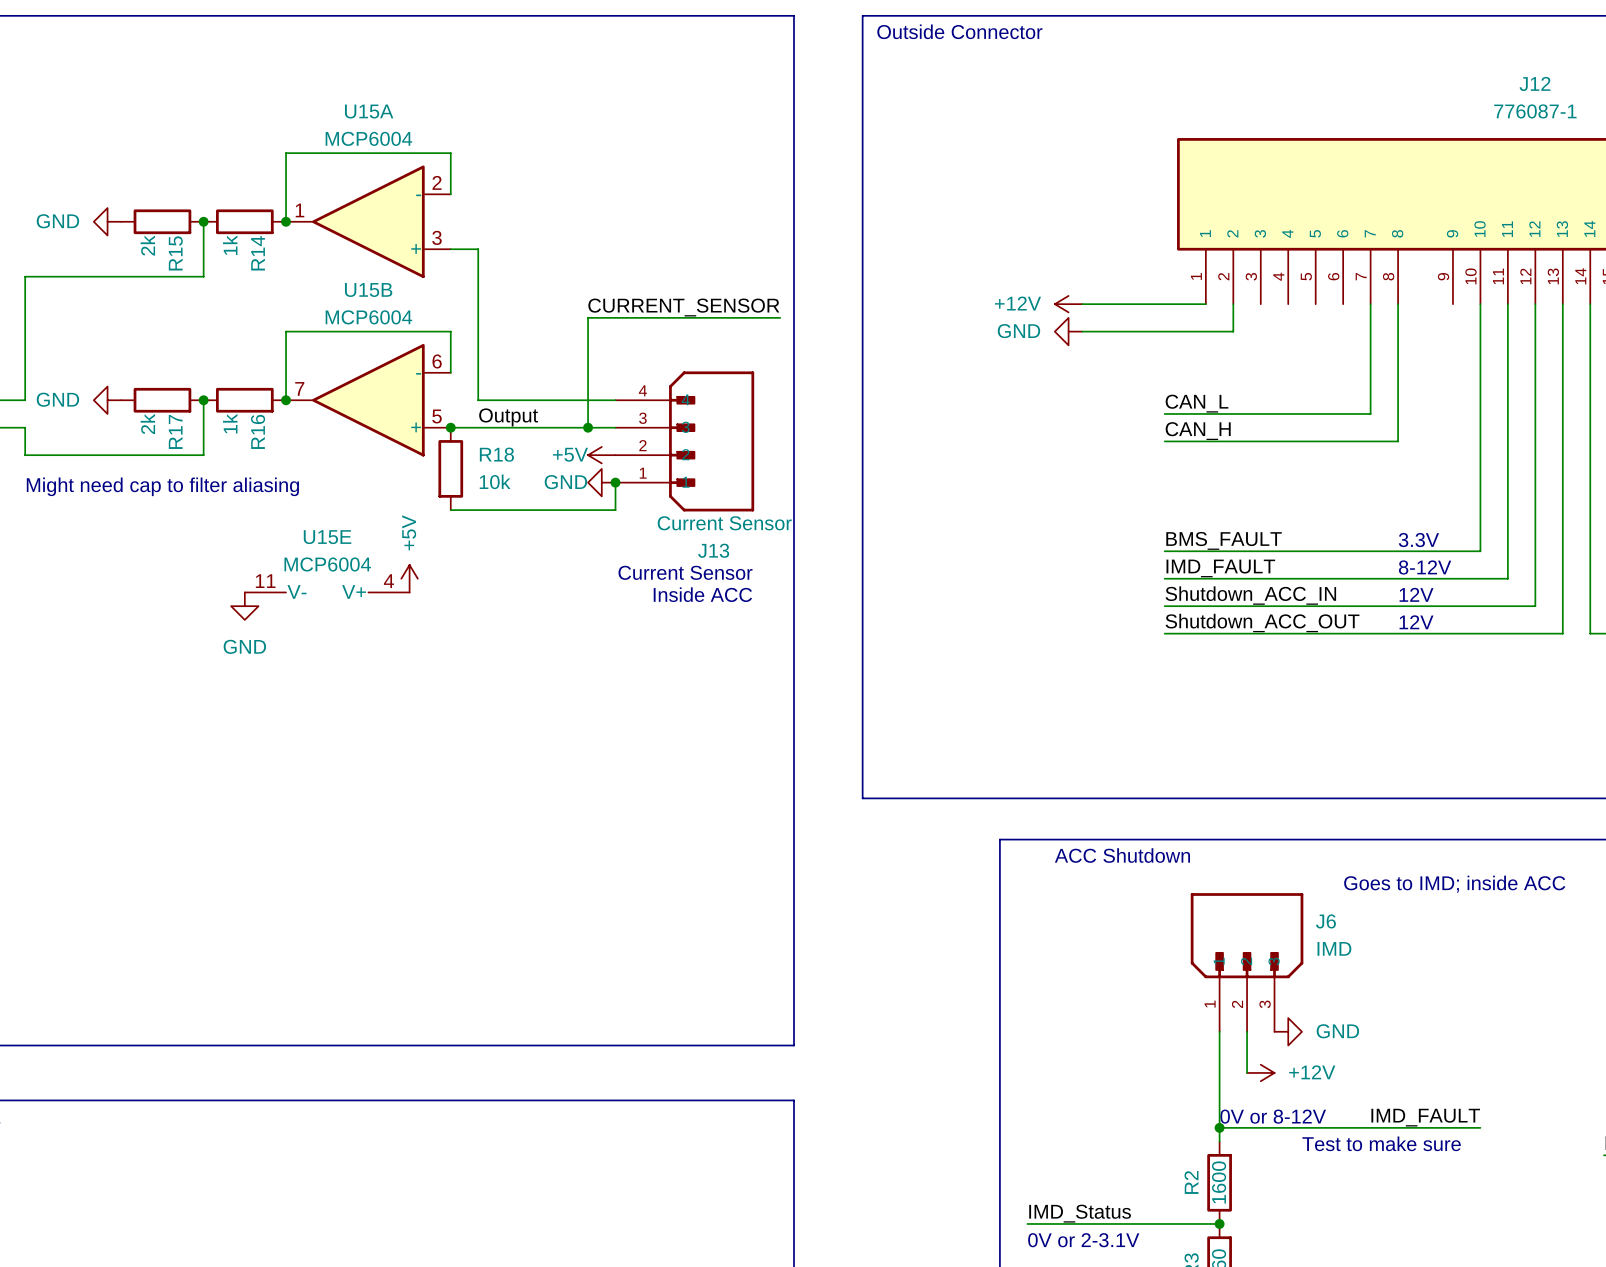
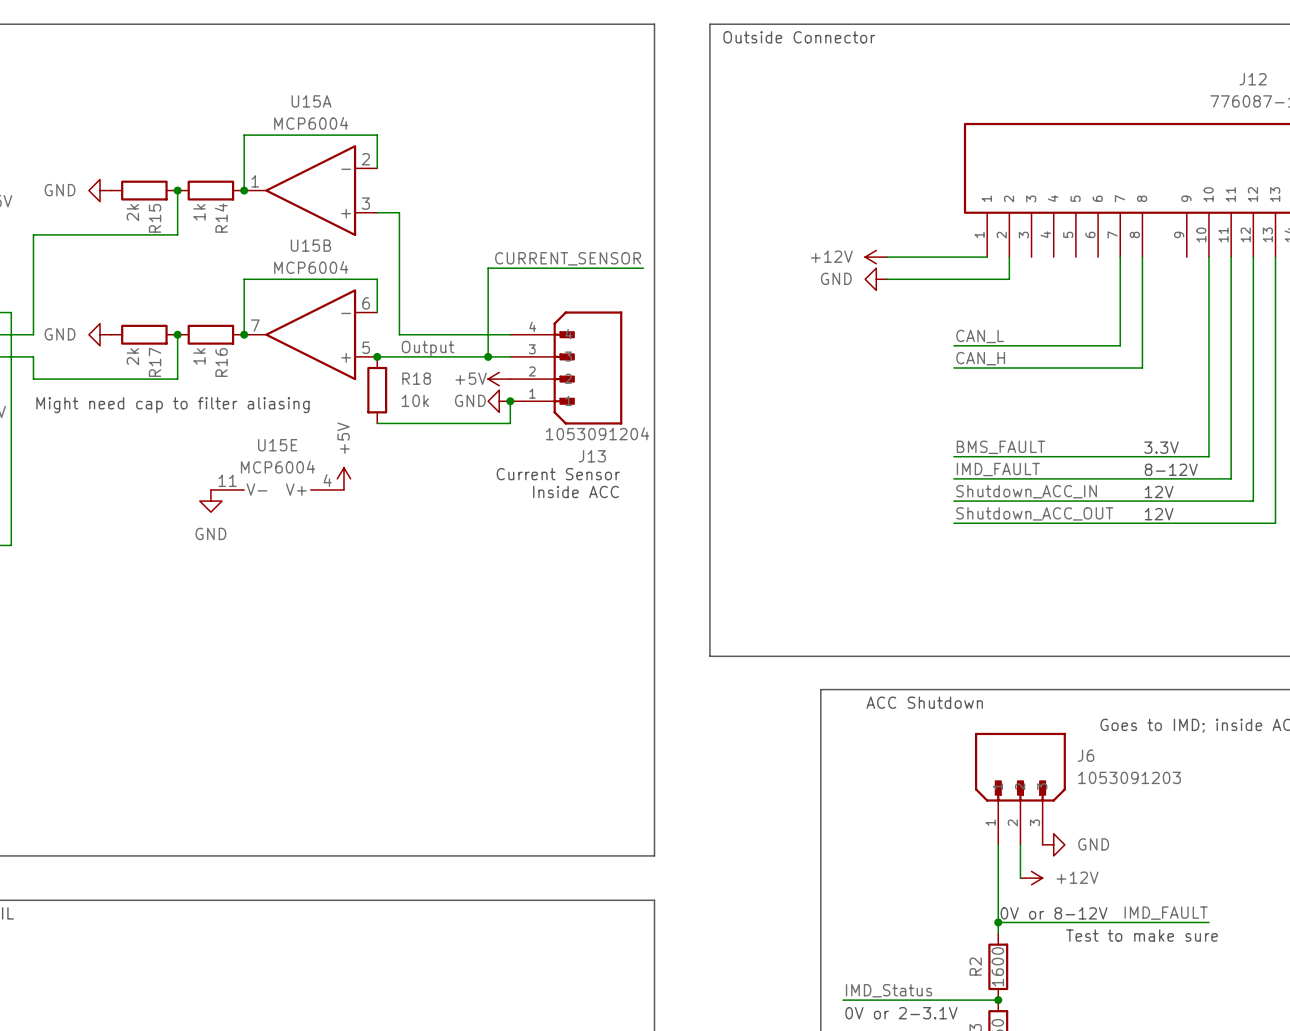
J13 value: Current Sensor (724, 523) -> 1053091204 (597, 433)
J6 value: IMD (1334, 948) -> 1053091203 (1129, 777)

